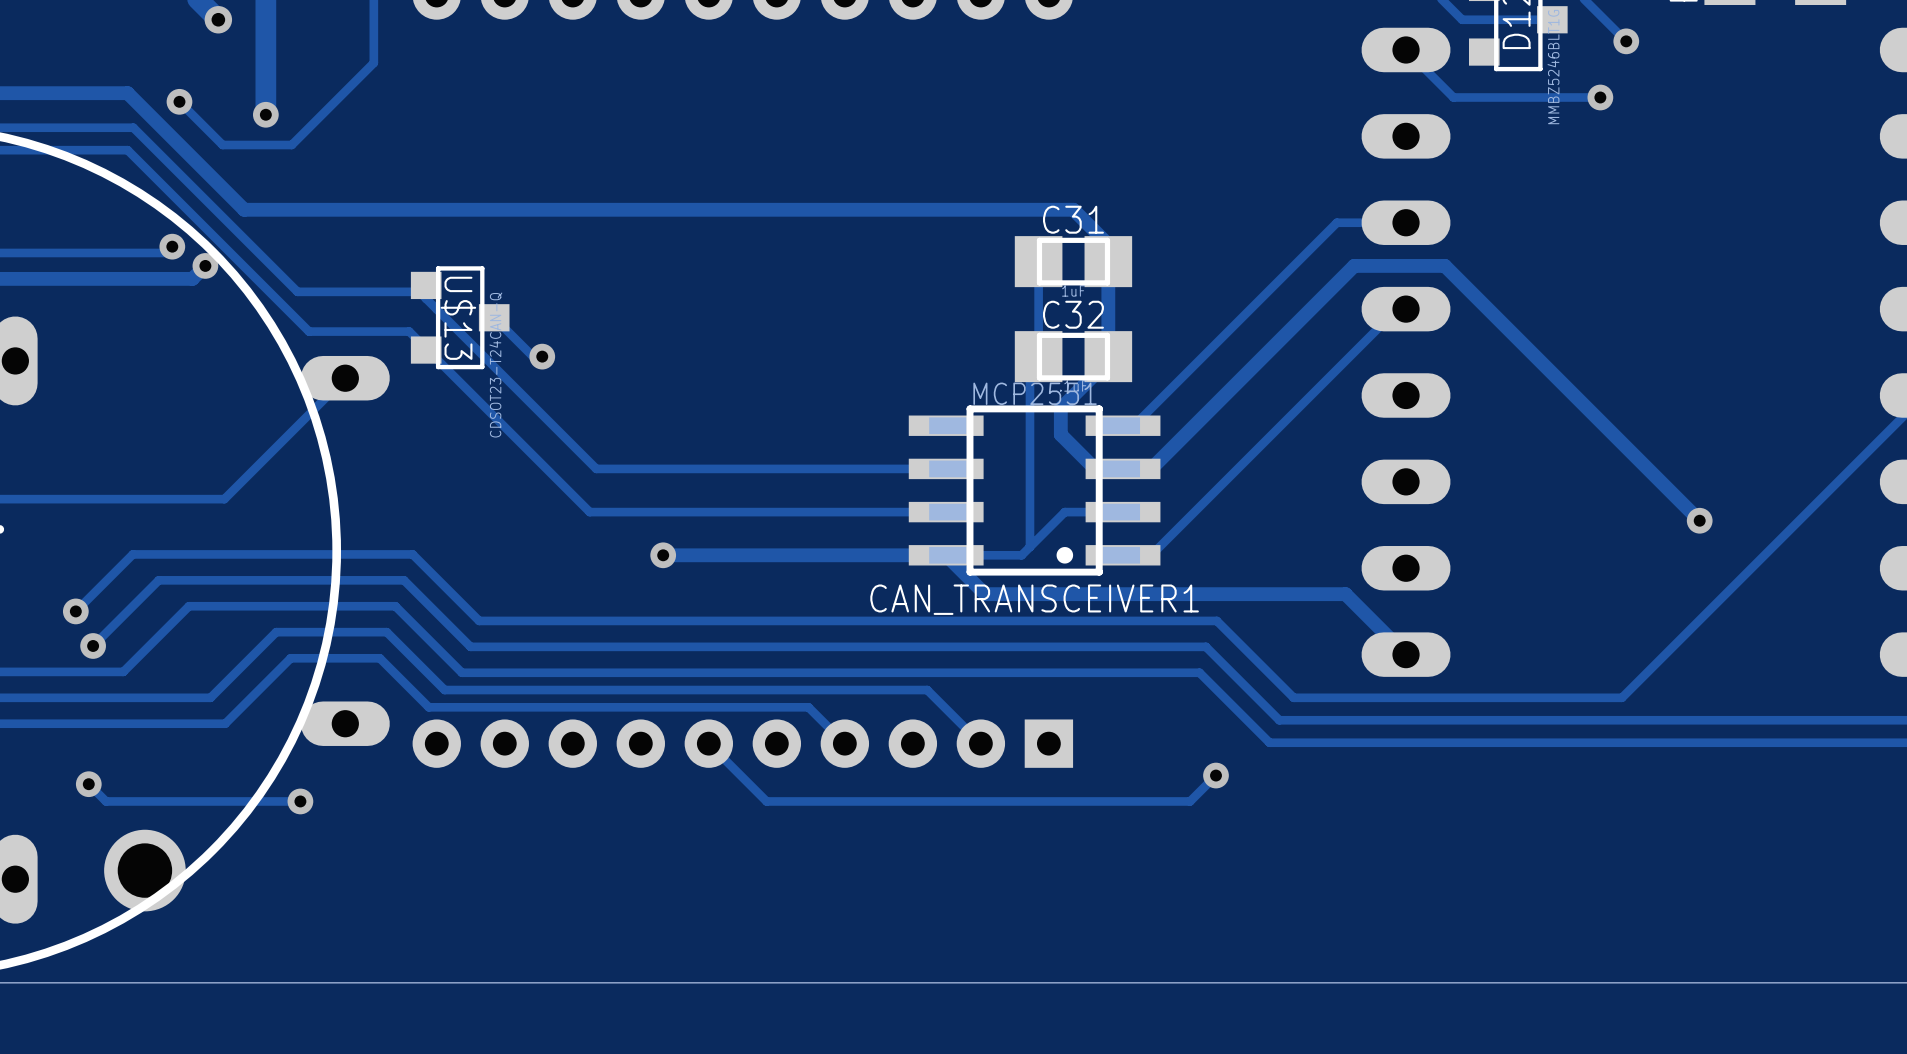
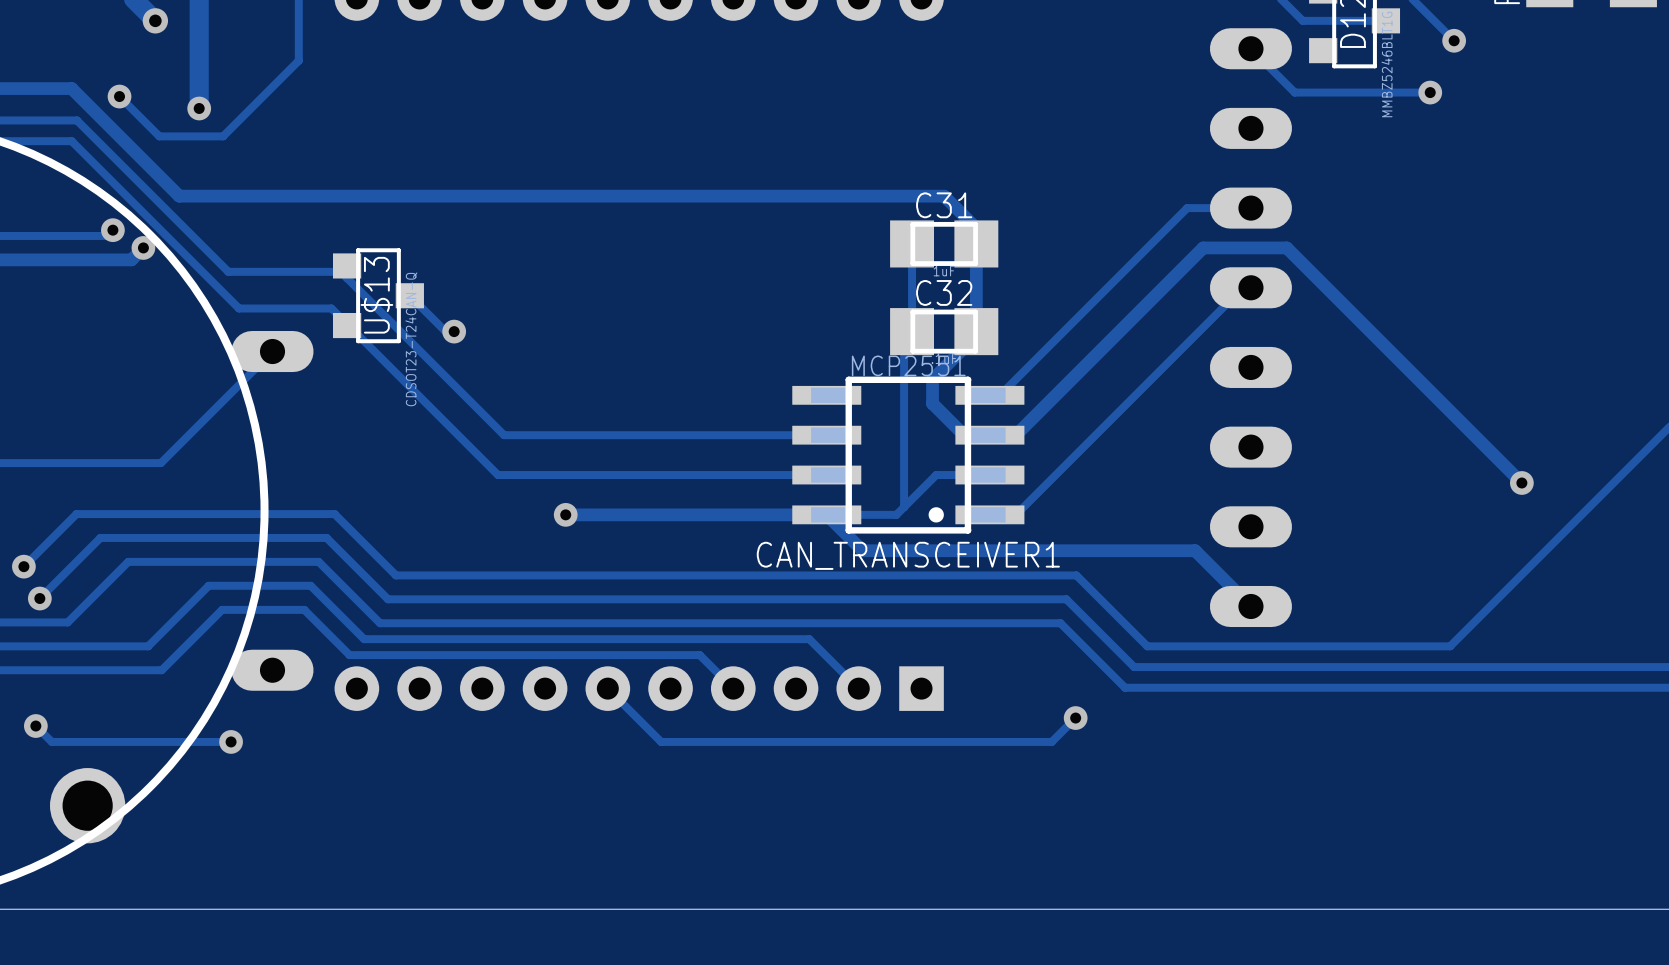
U$13 name rotation: 0° (458, 318) -> 180° (376, 295)

